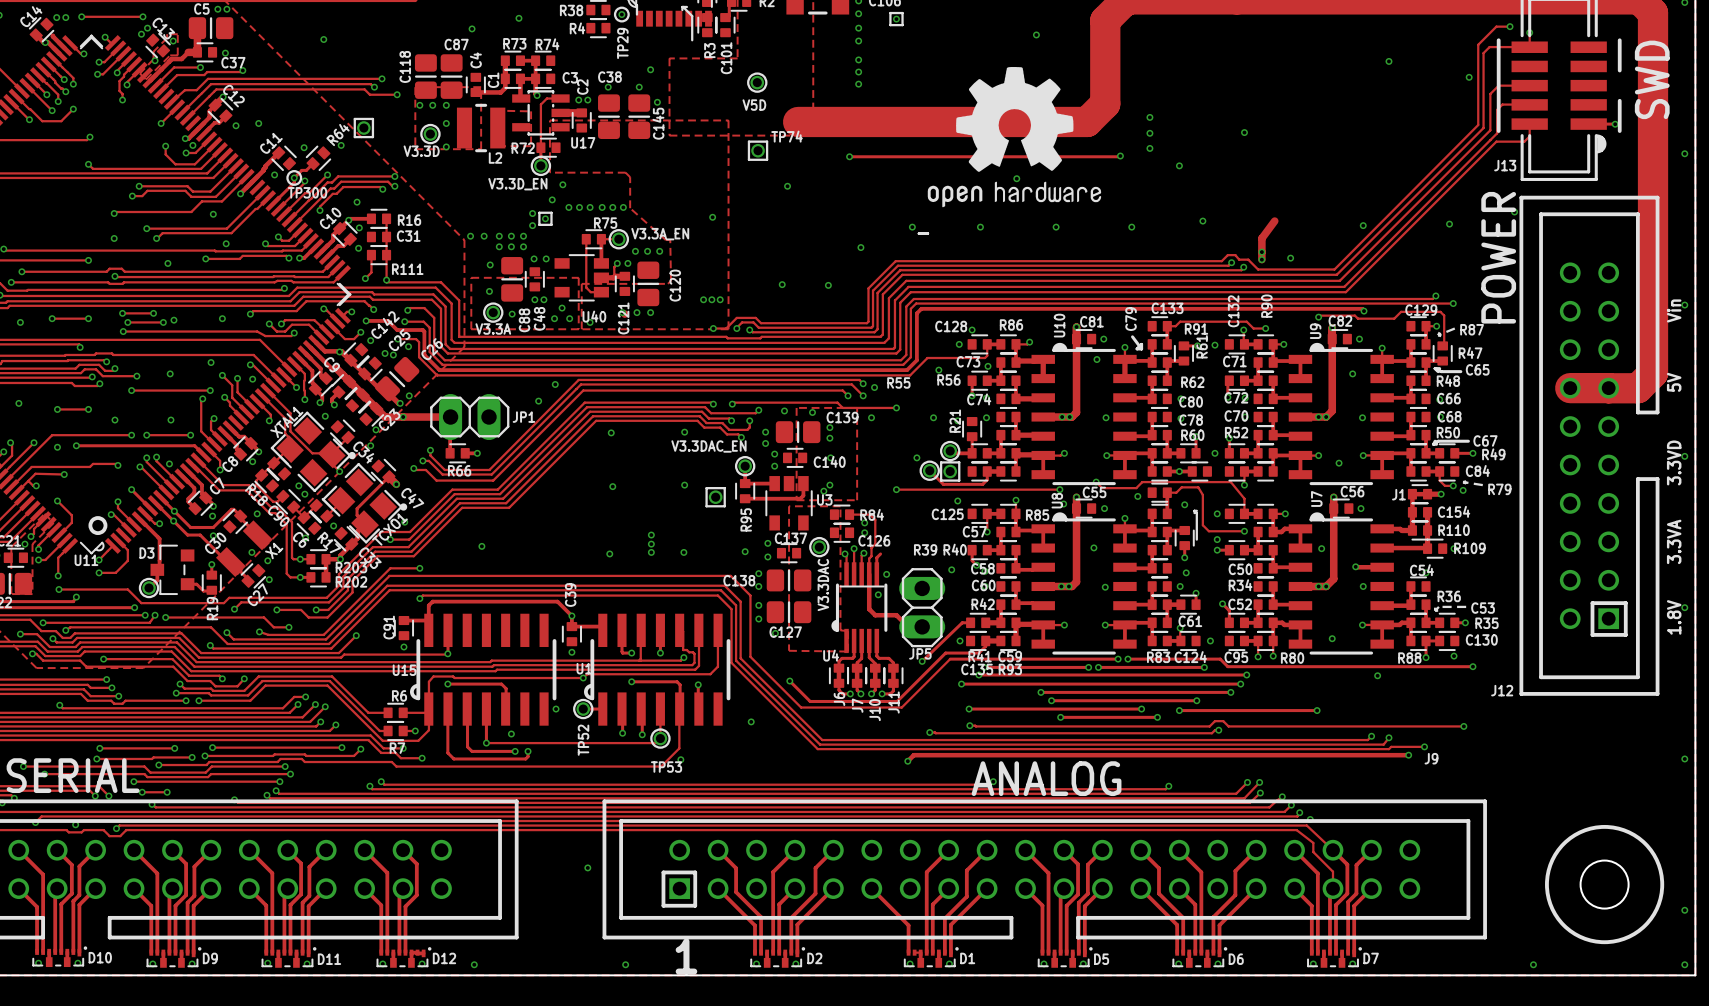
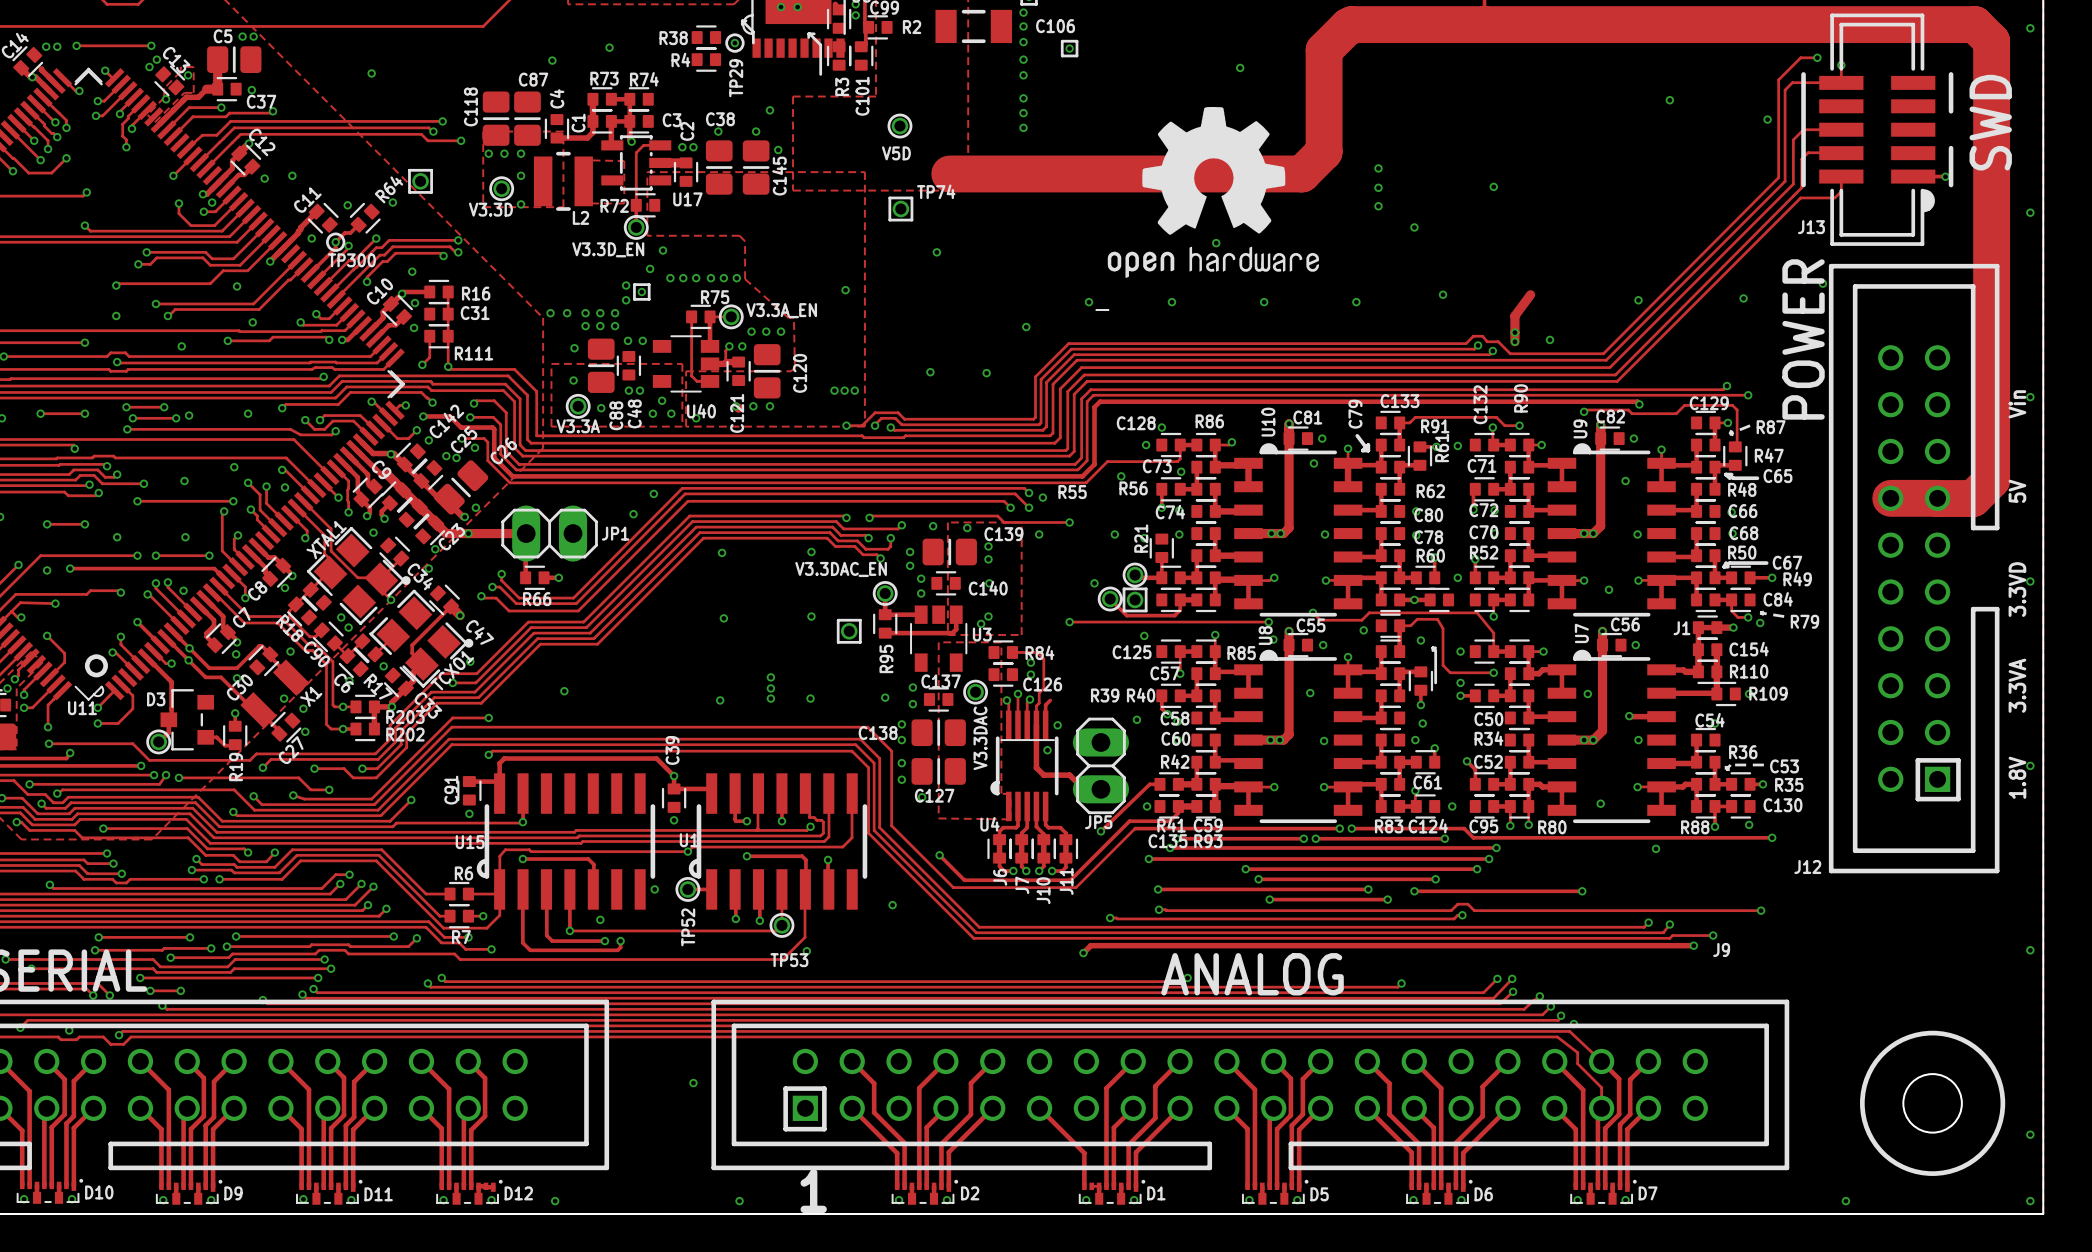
via: (849, 156) -> none
track: (1120, 156) (849, 156) -> none
via: (1120, 156) -> none

